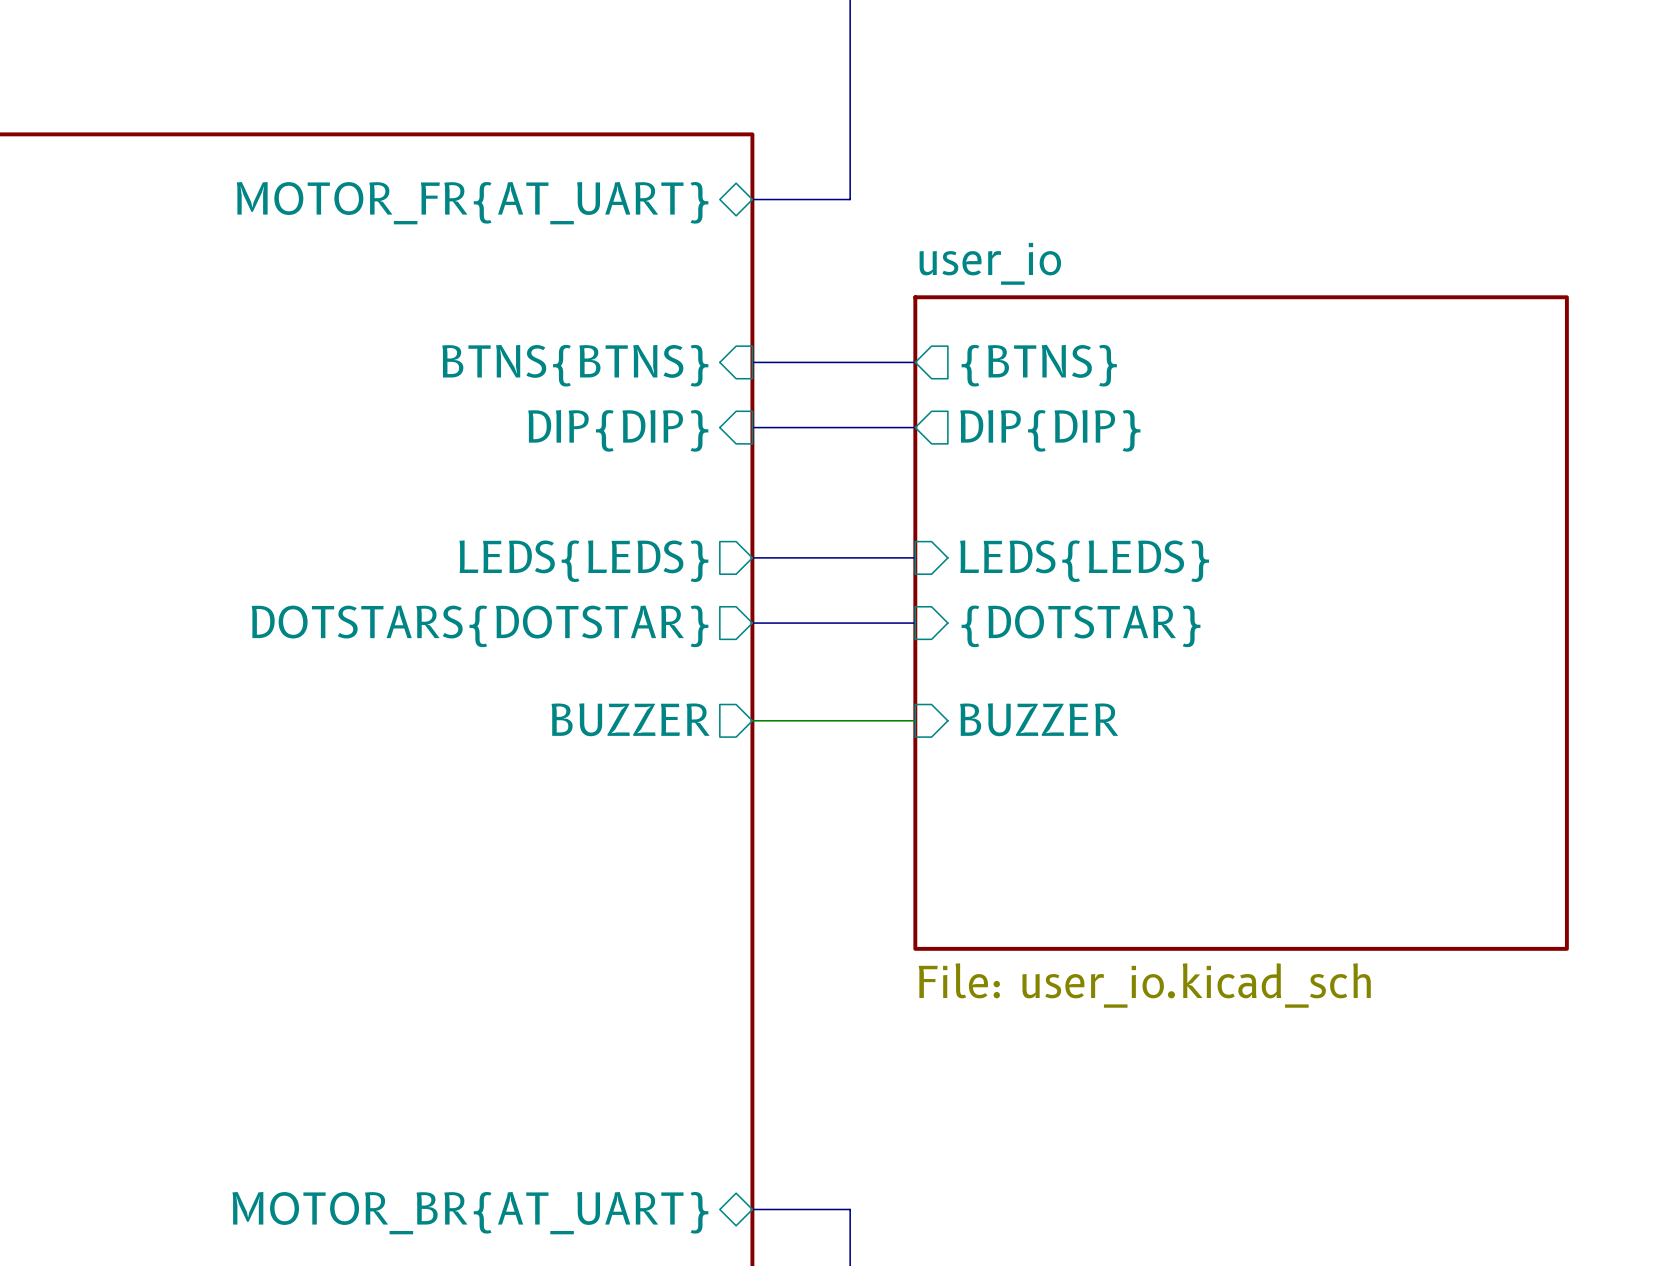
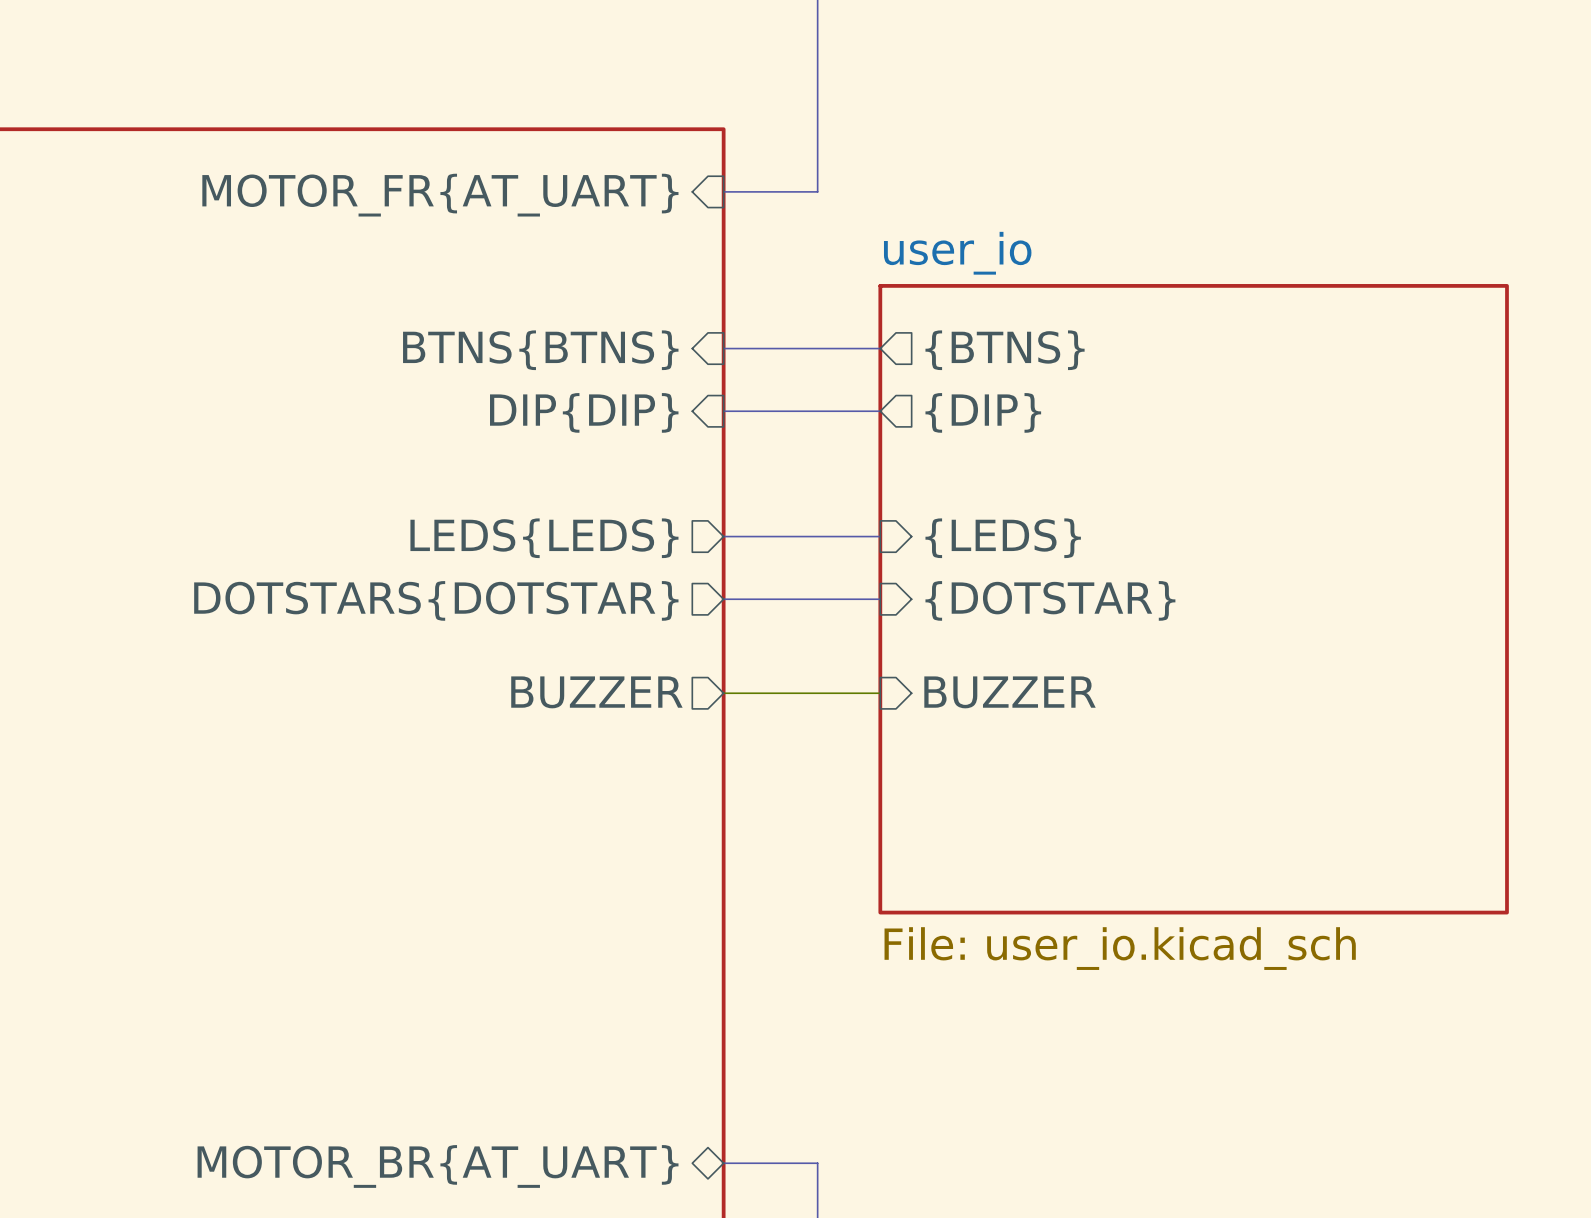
sheet pin shape: bidirectional (472, 203) -> input (440, 195)
sheet pin: DIP{DIP} (1050, 430) -> {DIP} (983, 412)
sheet pin: LEDS{LEDS} (1084, 561) -> {LEDS} (1003, 538)

